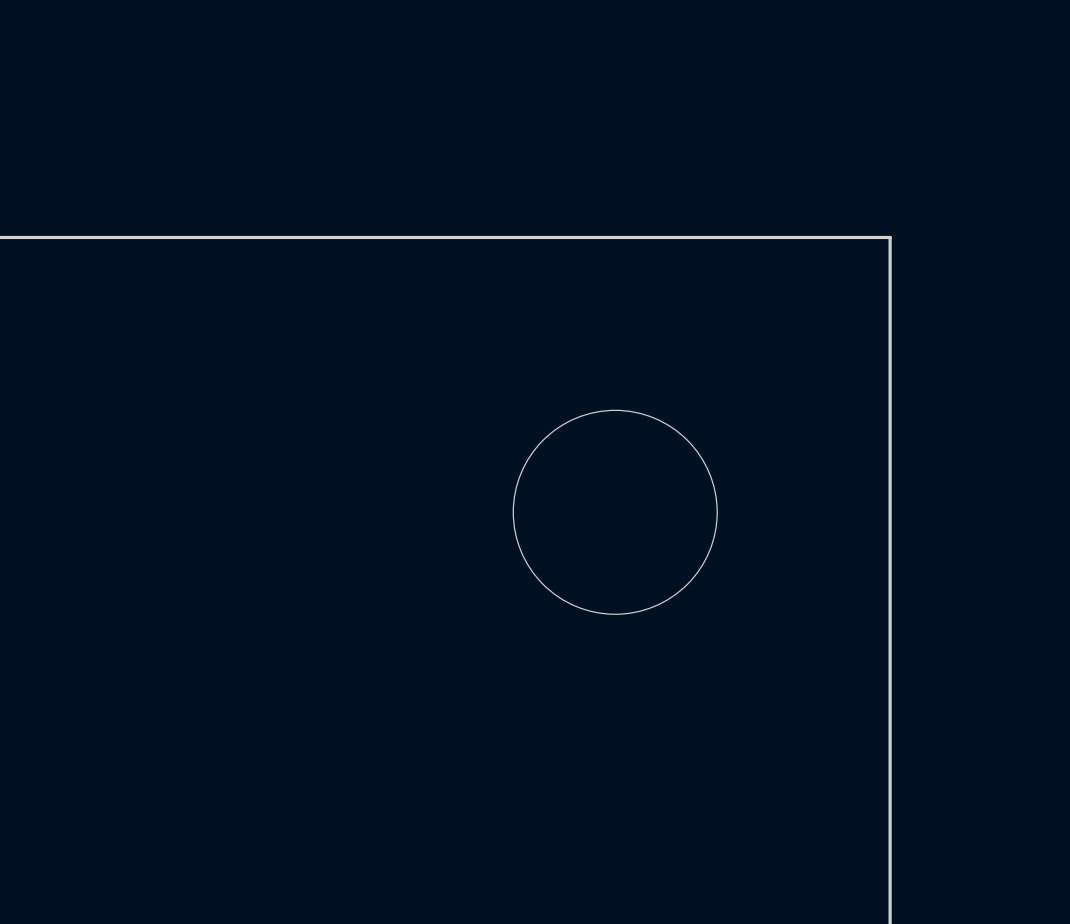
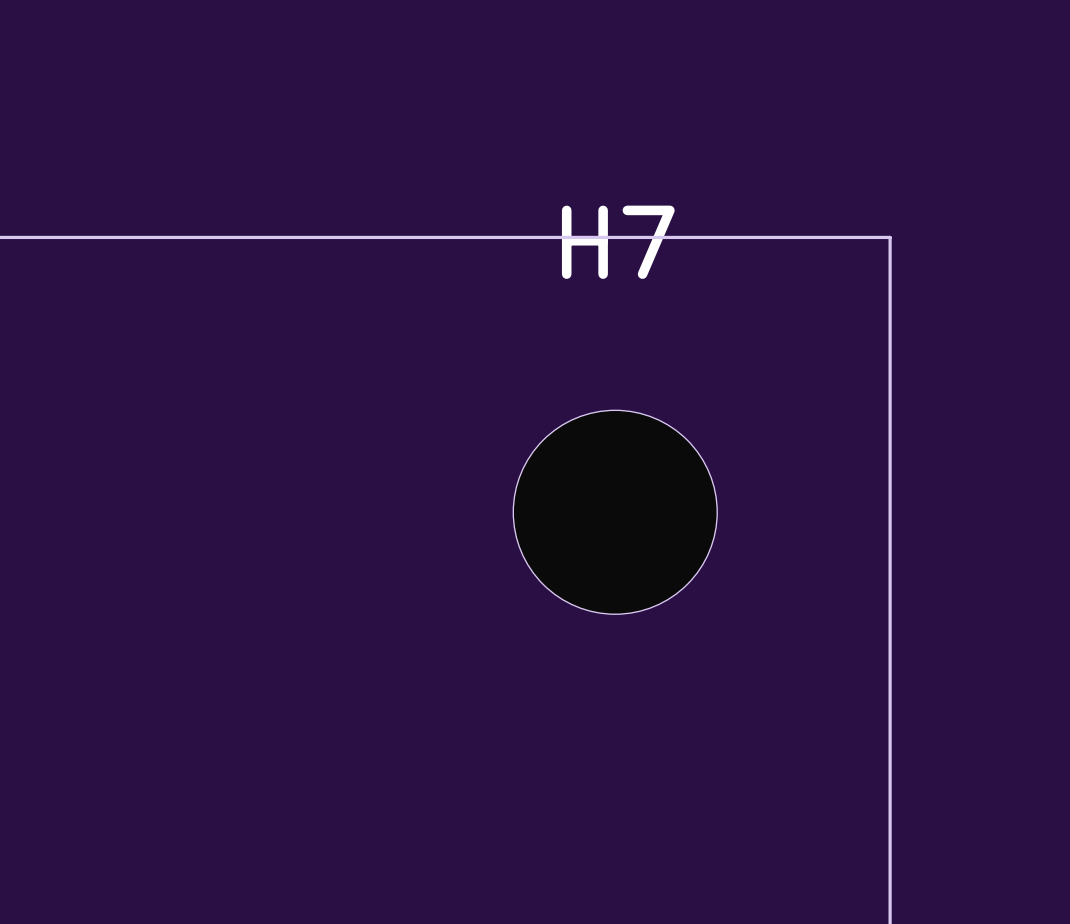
H7 name: none -> H7 (618, 242)

